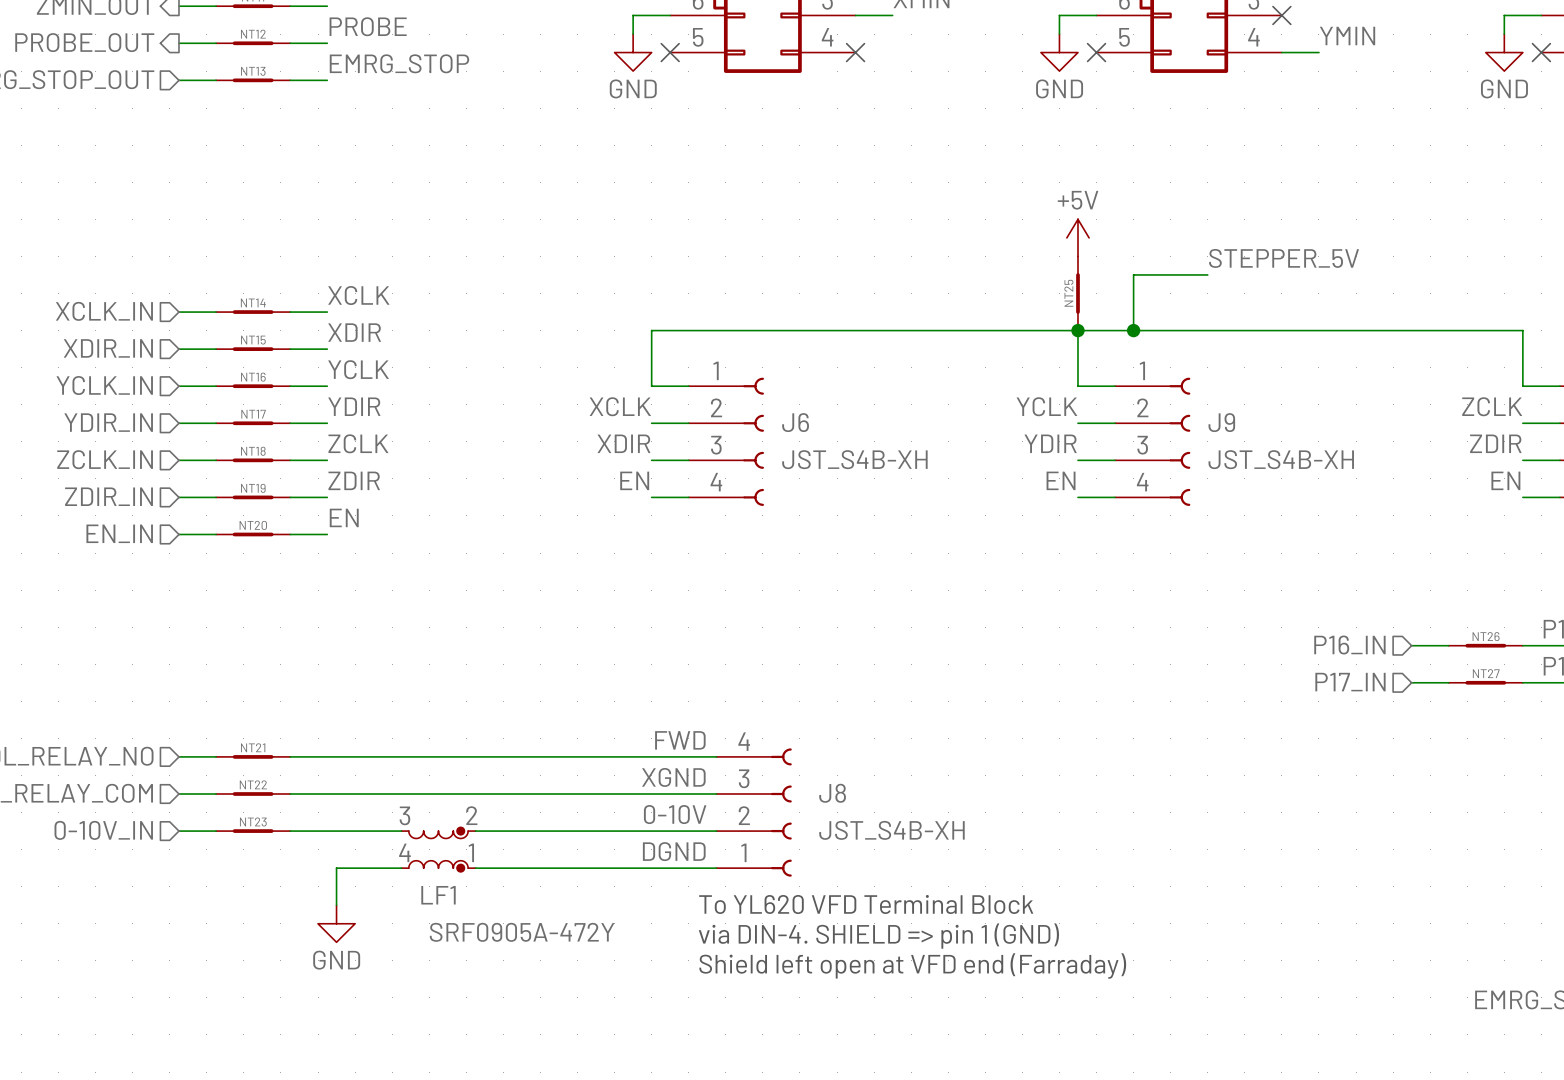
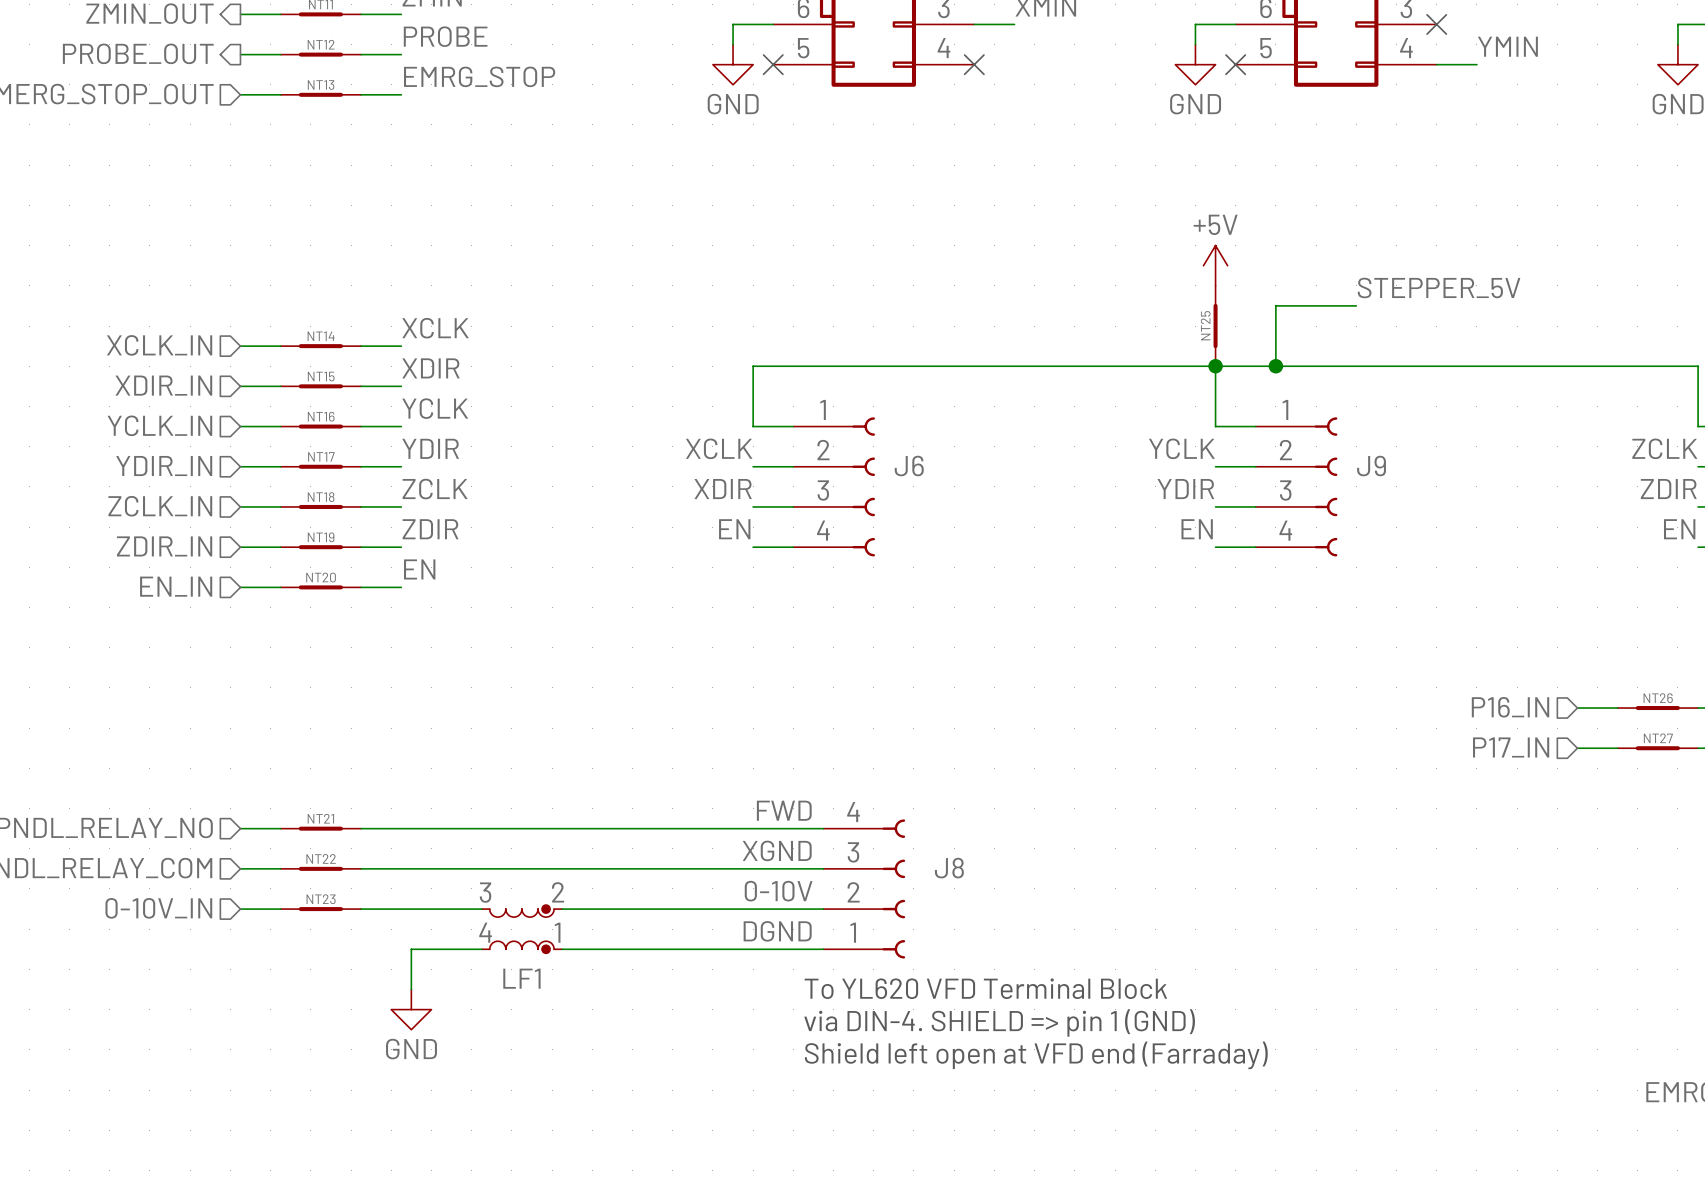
J6 value: JST_S4B-XH (854, 459) -> none
J9 value: JST_S4B-XH (1281, 459) -> none
J8 value: JST_S4B-XH (891, 830) -> none
LF1 value: SRF0905A-472Y (522, 932) -> none

